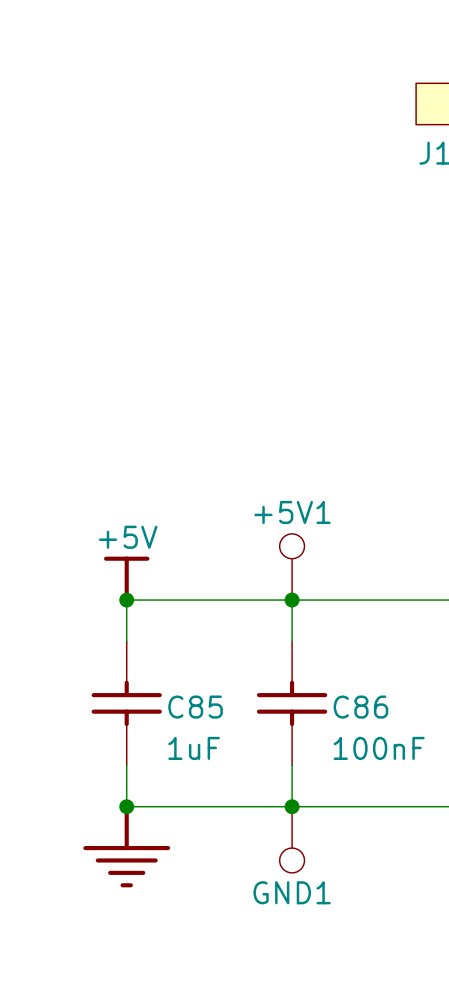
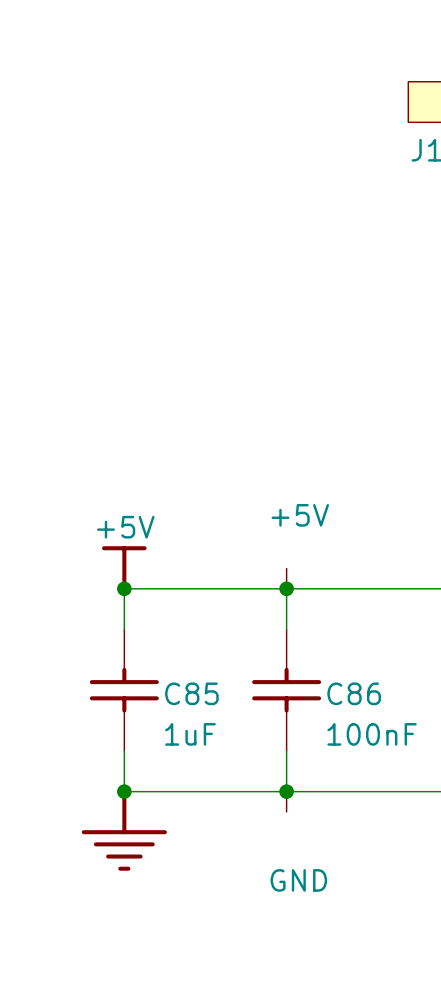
+5V1: (292, 566) -> none
+5V: none -> (286, 578)
GND: none -> (286, 801)
GND1: (292, 839) -> none

